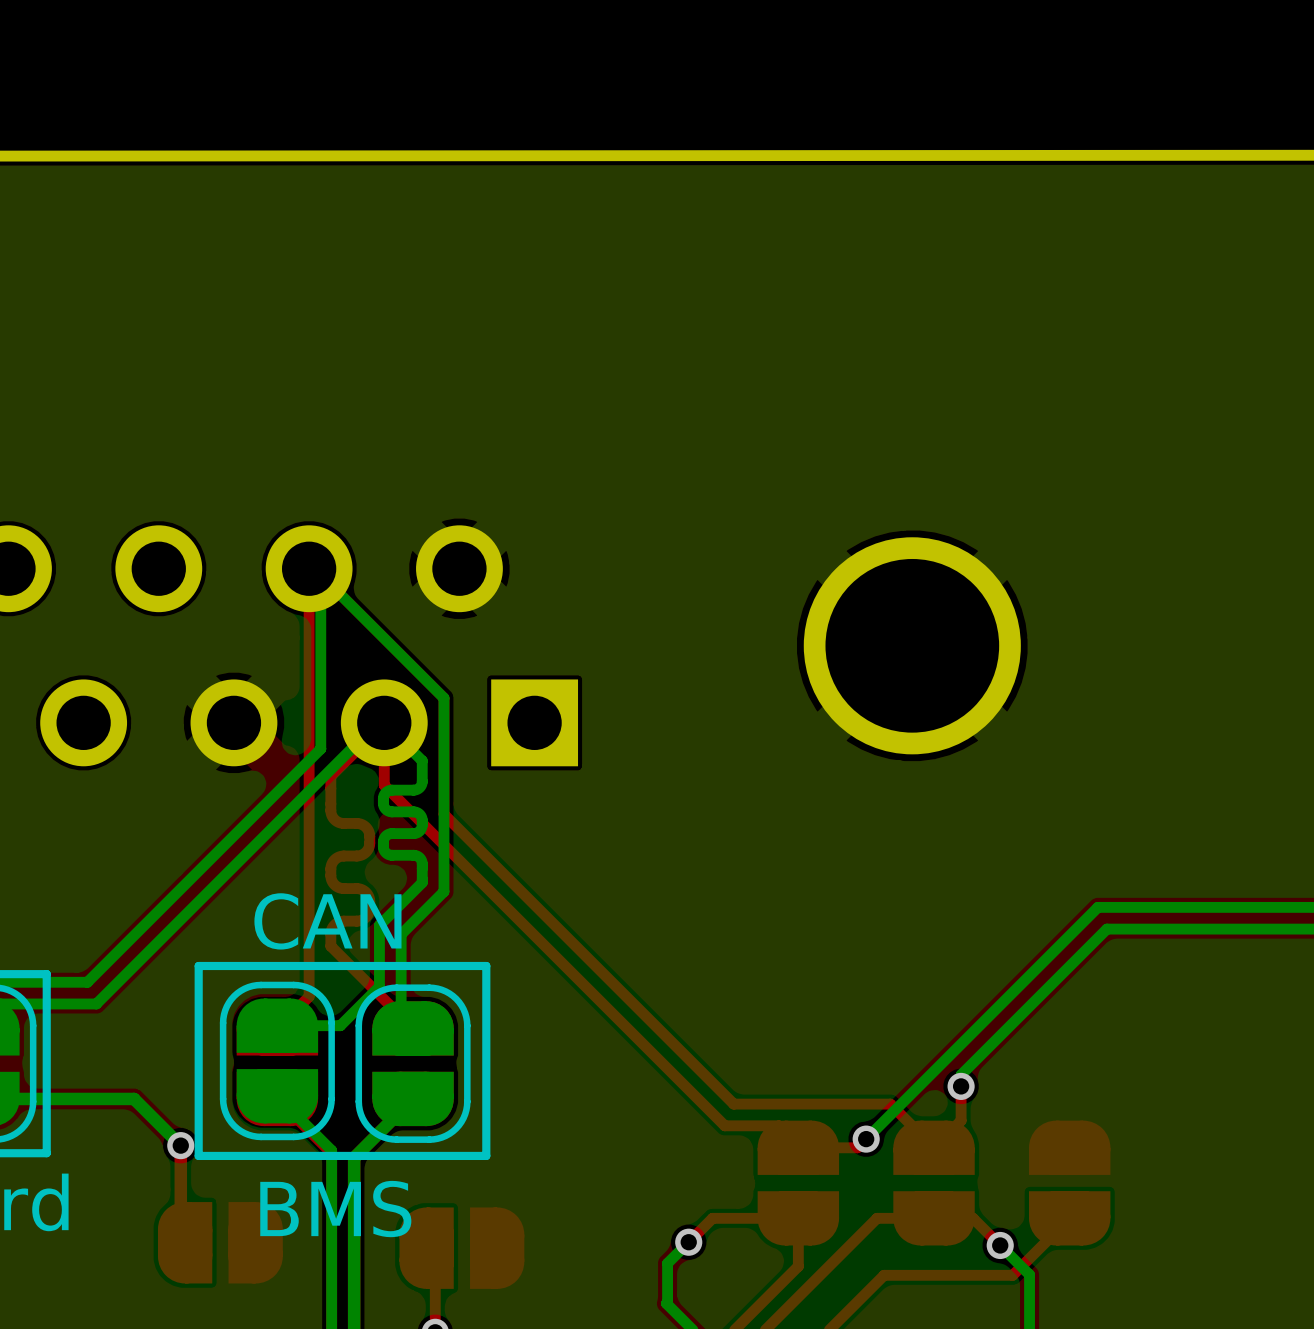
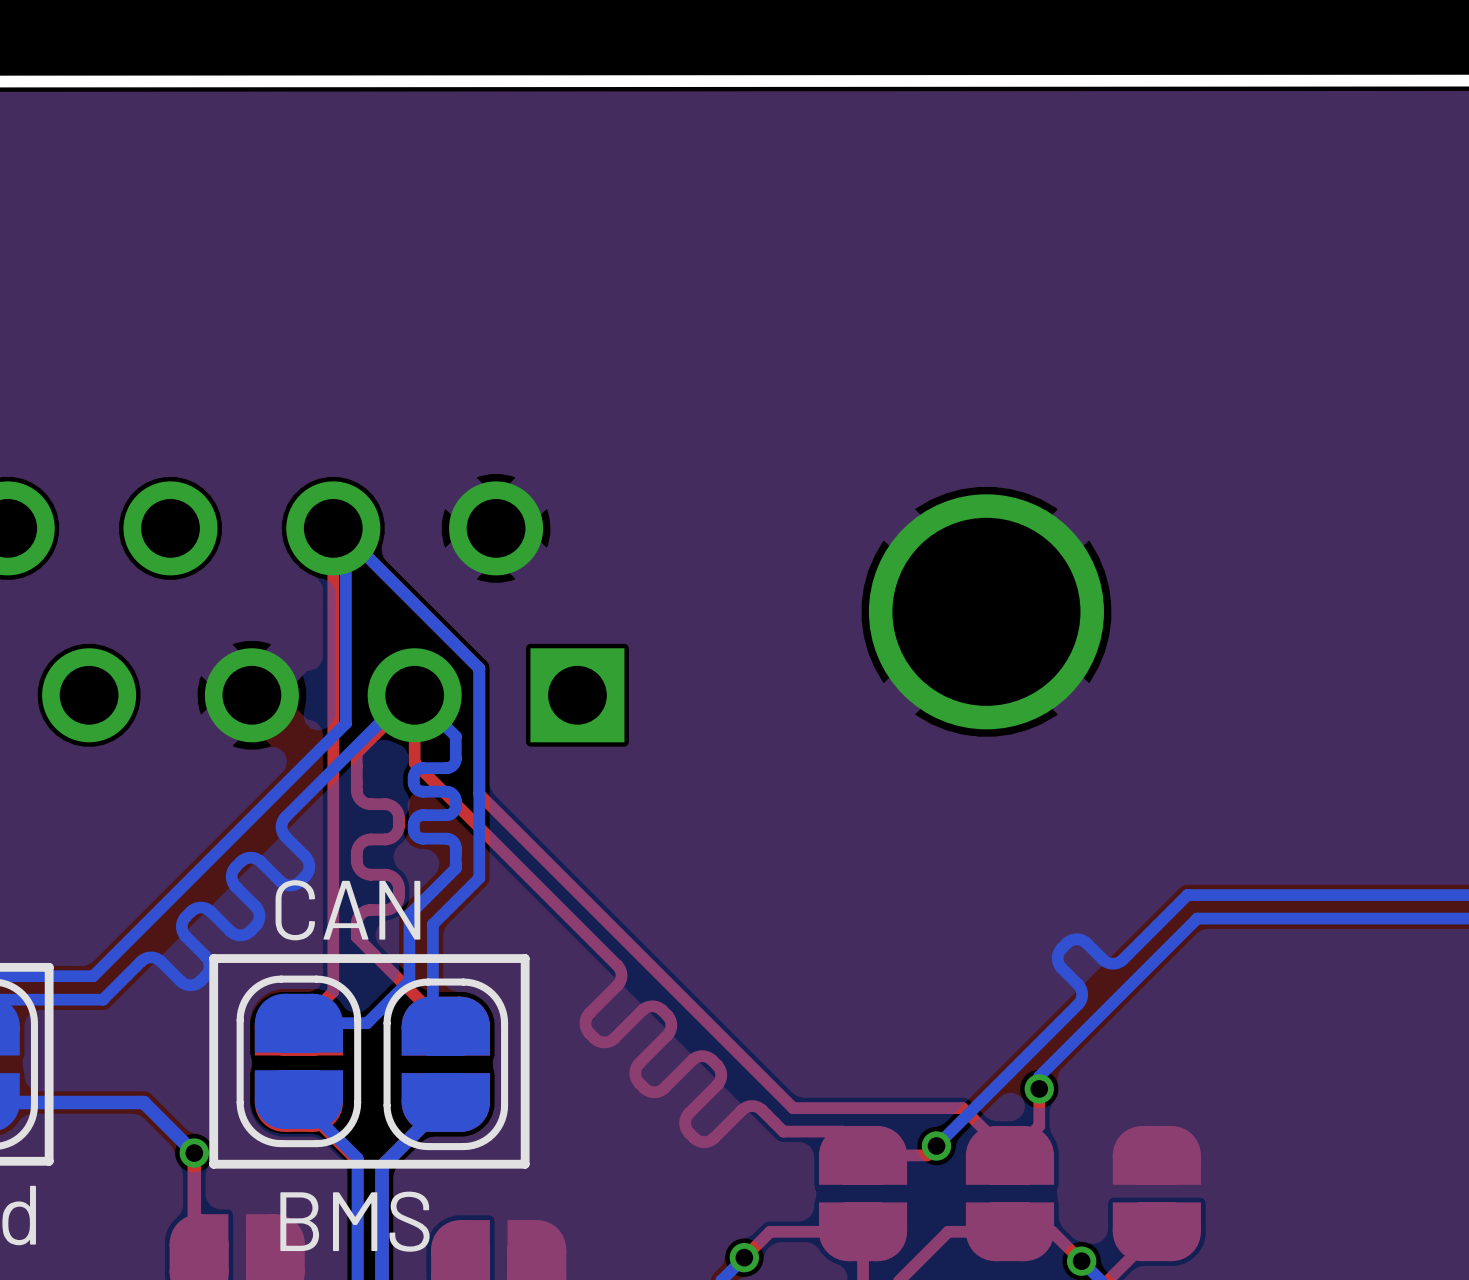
bottom track: (265, 835) (223, 876) -> (285, 816) (281, 825) (283, 833) (308, 862) (308, 871) (300, 881) (293, 885) (285, 884) (257, 859) (248, 857) (240, 861)
bottom track: (219, 881) (177, 922) -> (235, 866) (231, 874) (233, 883) (259, 912) (258, 921) (250, 931) (243, 934) (235, 934) (207, 909) (199, 907) (190, 911)
bottom track: (173, 927) (131, 968) -> (185, 916) (181, 924) (183, 933) (209, 962) (208, 971) (200, 981) (193, 984) (185, 984) (158, 959) (149, 957) (141, 961)
bottom track: (1038, 966) (996, 1008) -> (1122, 959) (1114, 963) (1106, 962) (1085, 942) (1079, 939) (1070, 940) (1061, 948) (1058, 955) (1059, 964) (1081, 989) (1081, 997) (1078, 1004)
top track: (571, 972) (612, 1013) -> (617, 965) (621, 973) (619, 983) (586, 1018) (586, 1029) (594, 1038) (602, 1042) (612, 1040) (646, 1007) (655, 1006) (662, 1010)
top track: (617, 1018) (658, 1059) -> (667, 1015) (671, 1023) (669, 1032) (636, 1068) (636, 1079) (644, 1088) (652, 1092) (661, 1090) (696, 1057) (705, 1056) (712, 1060)
top track: (663, 1064) (705, 1106) -> (717, 1065) (721, 1073) (719, 1082) (685, 1118) (686, 1129) (694, 1138) (702, 1142) (711, 1139) (746, 1107) (755, 1106) (761, 1110)

